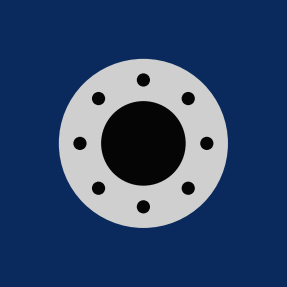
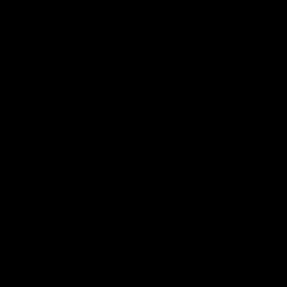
part: (143, 143) -> none

